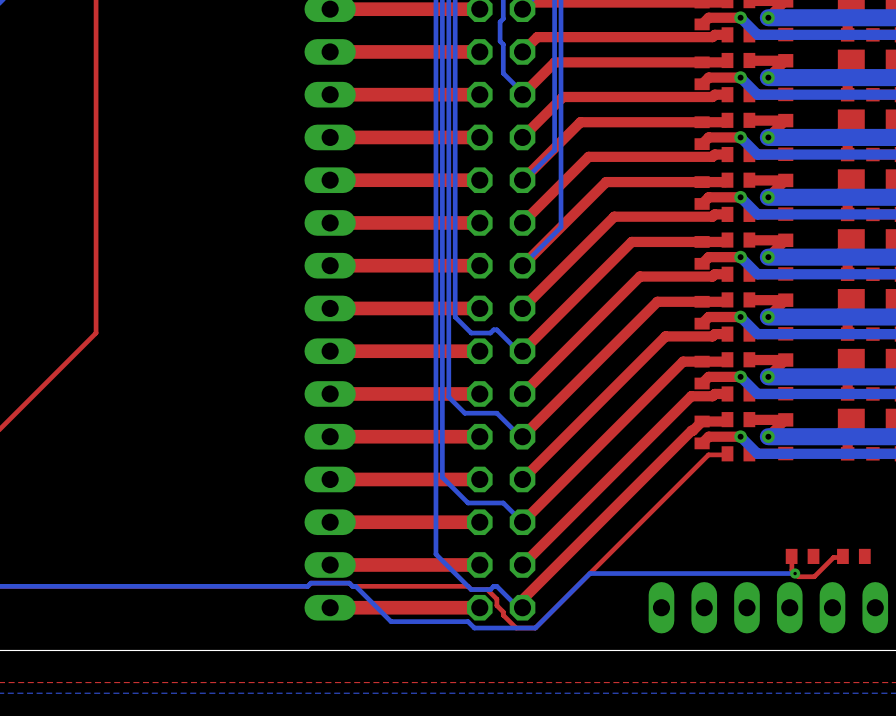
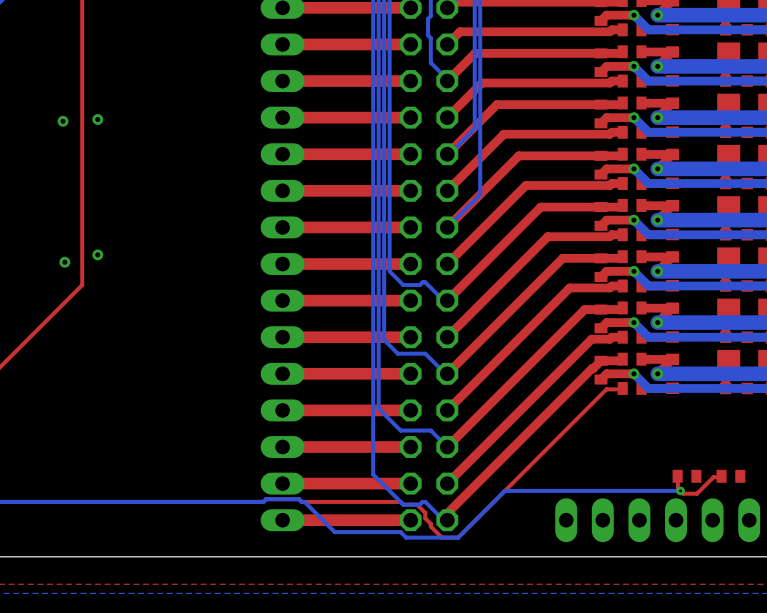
via: none -> (97, 119)
via: none -> (63, 121)
via: none -> (97, 254)
via: none -> (64, 262)

